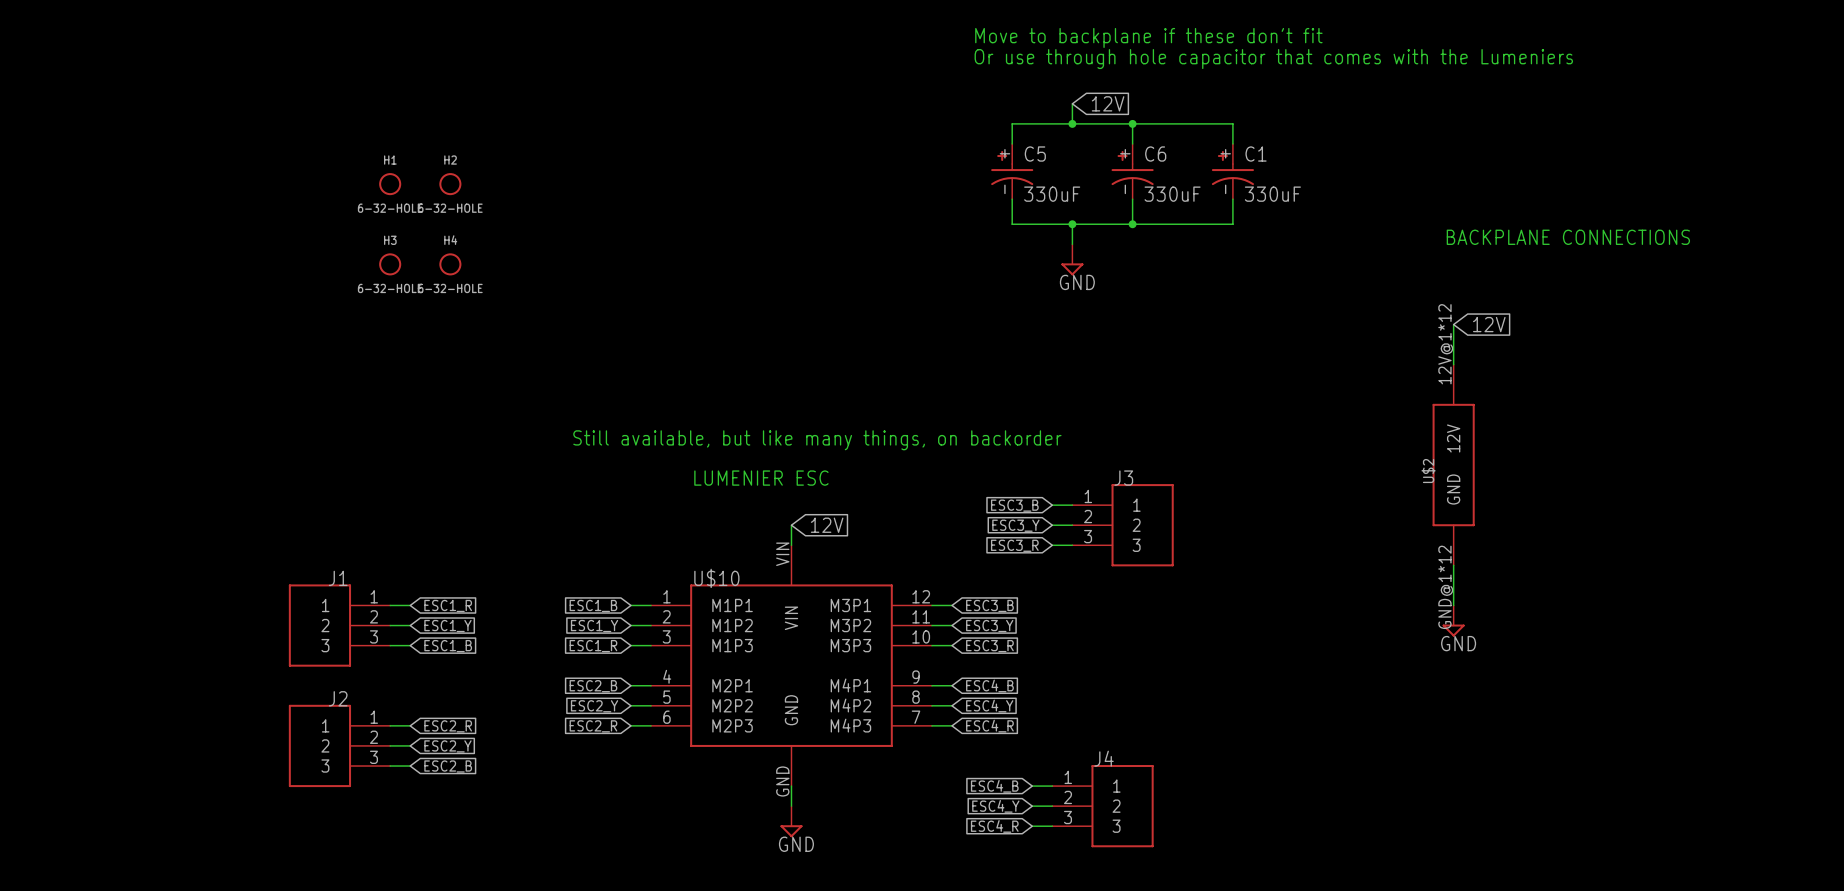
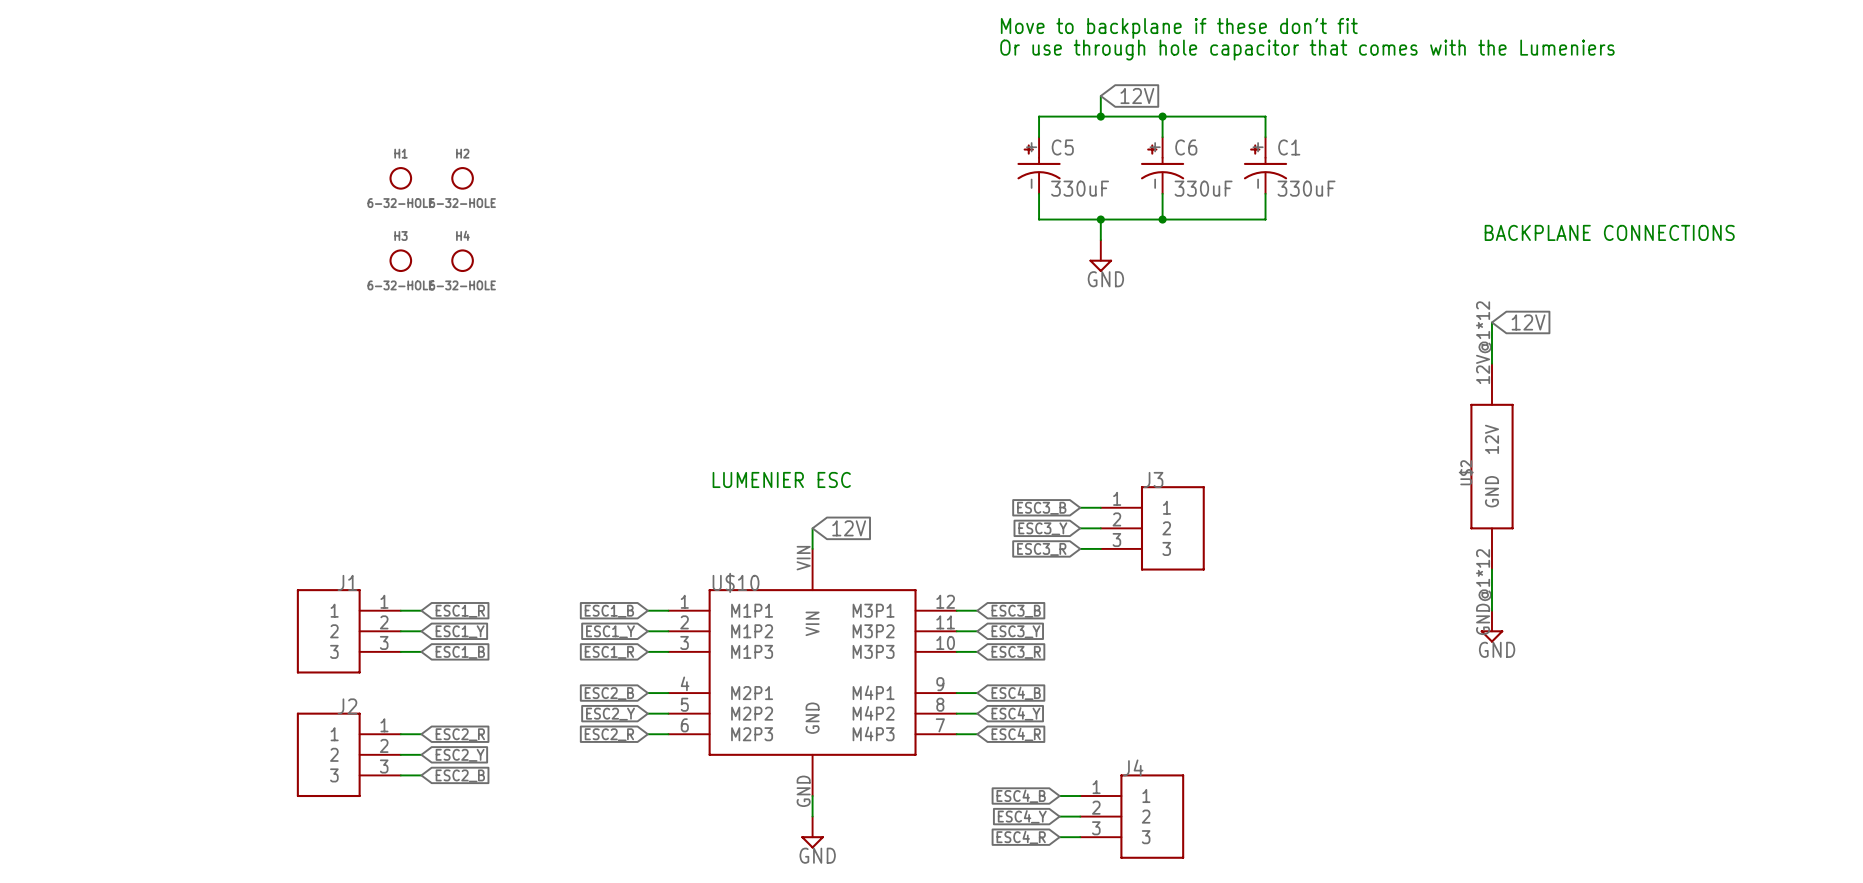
text: Still available, but like many things, on backorder (817, 440) -> none

